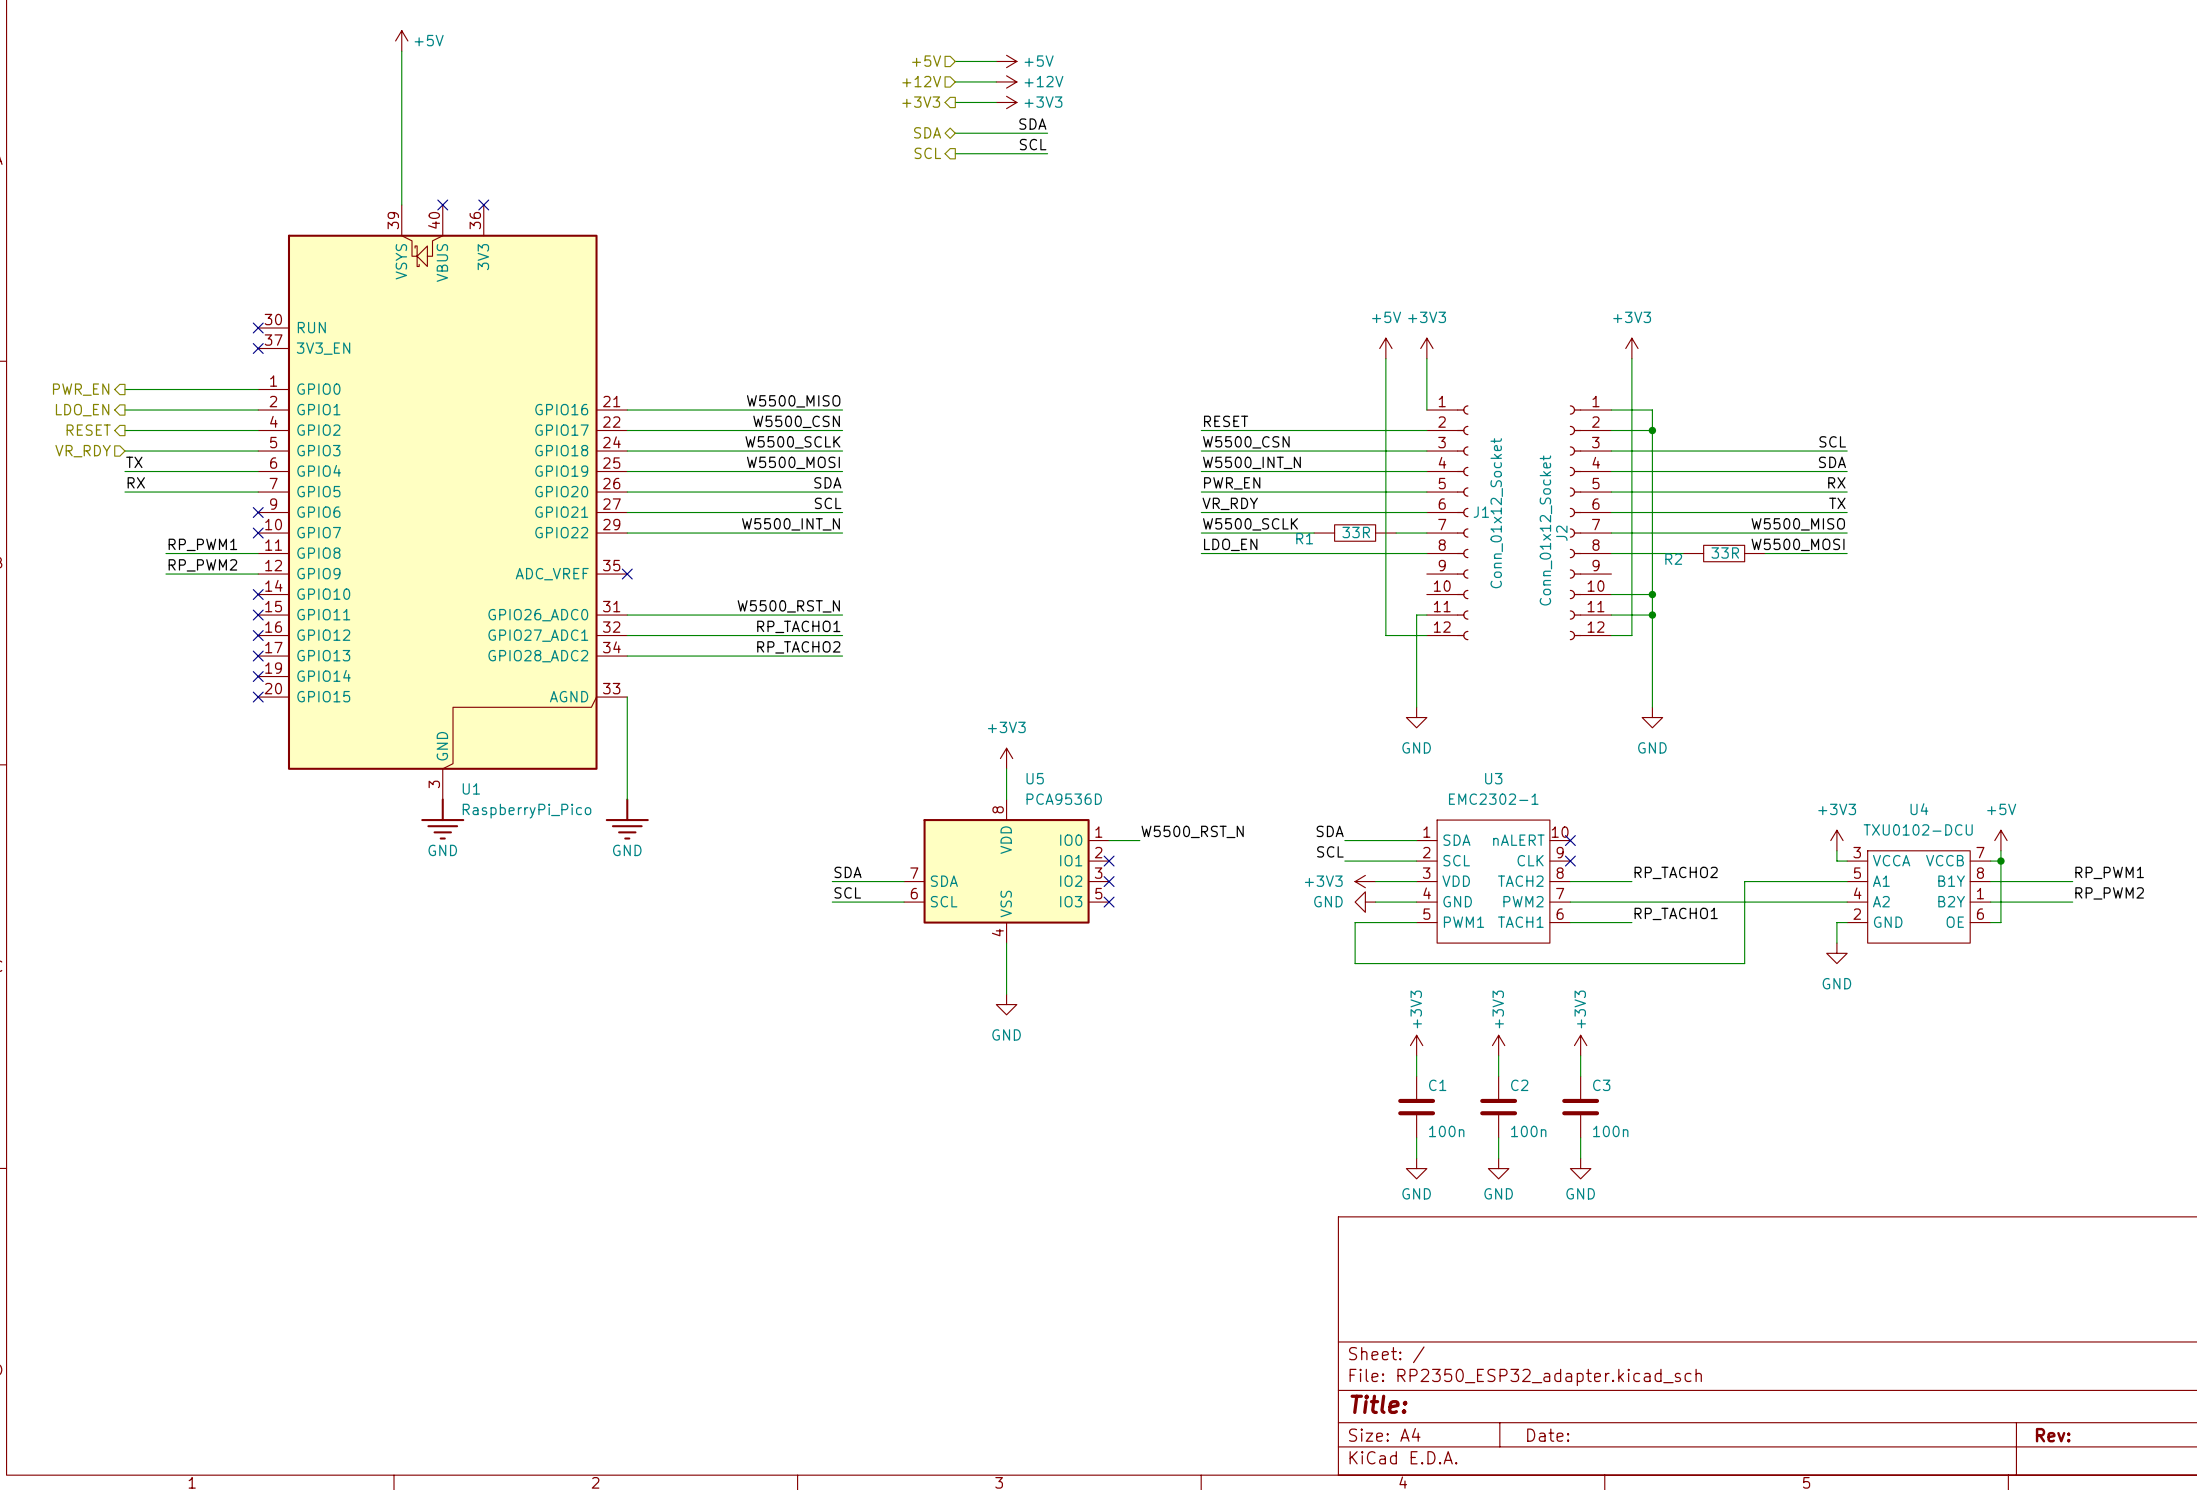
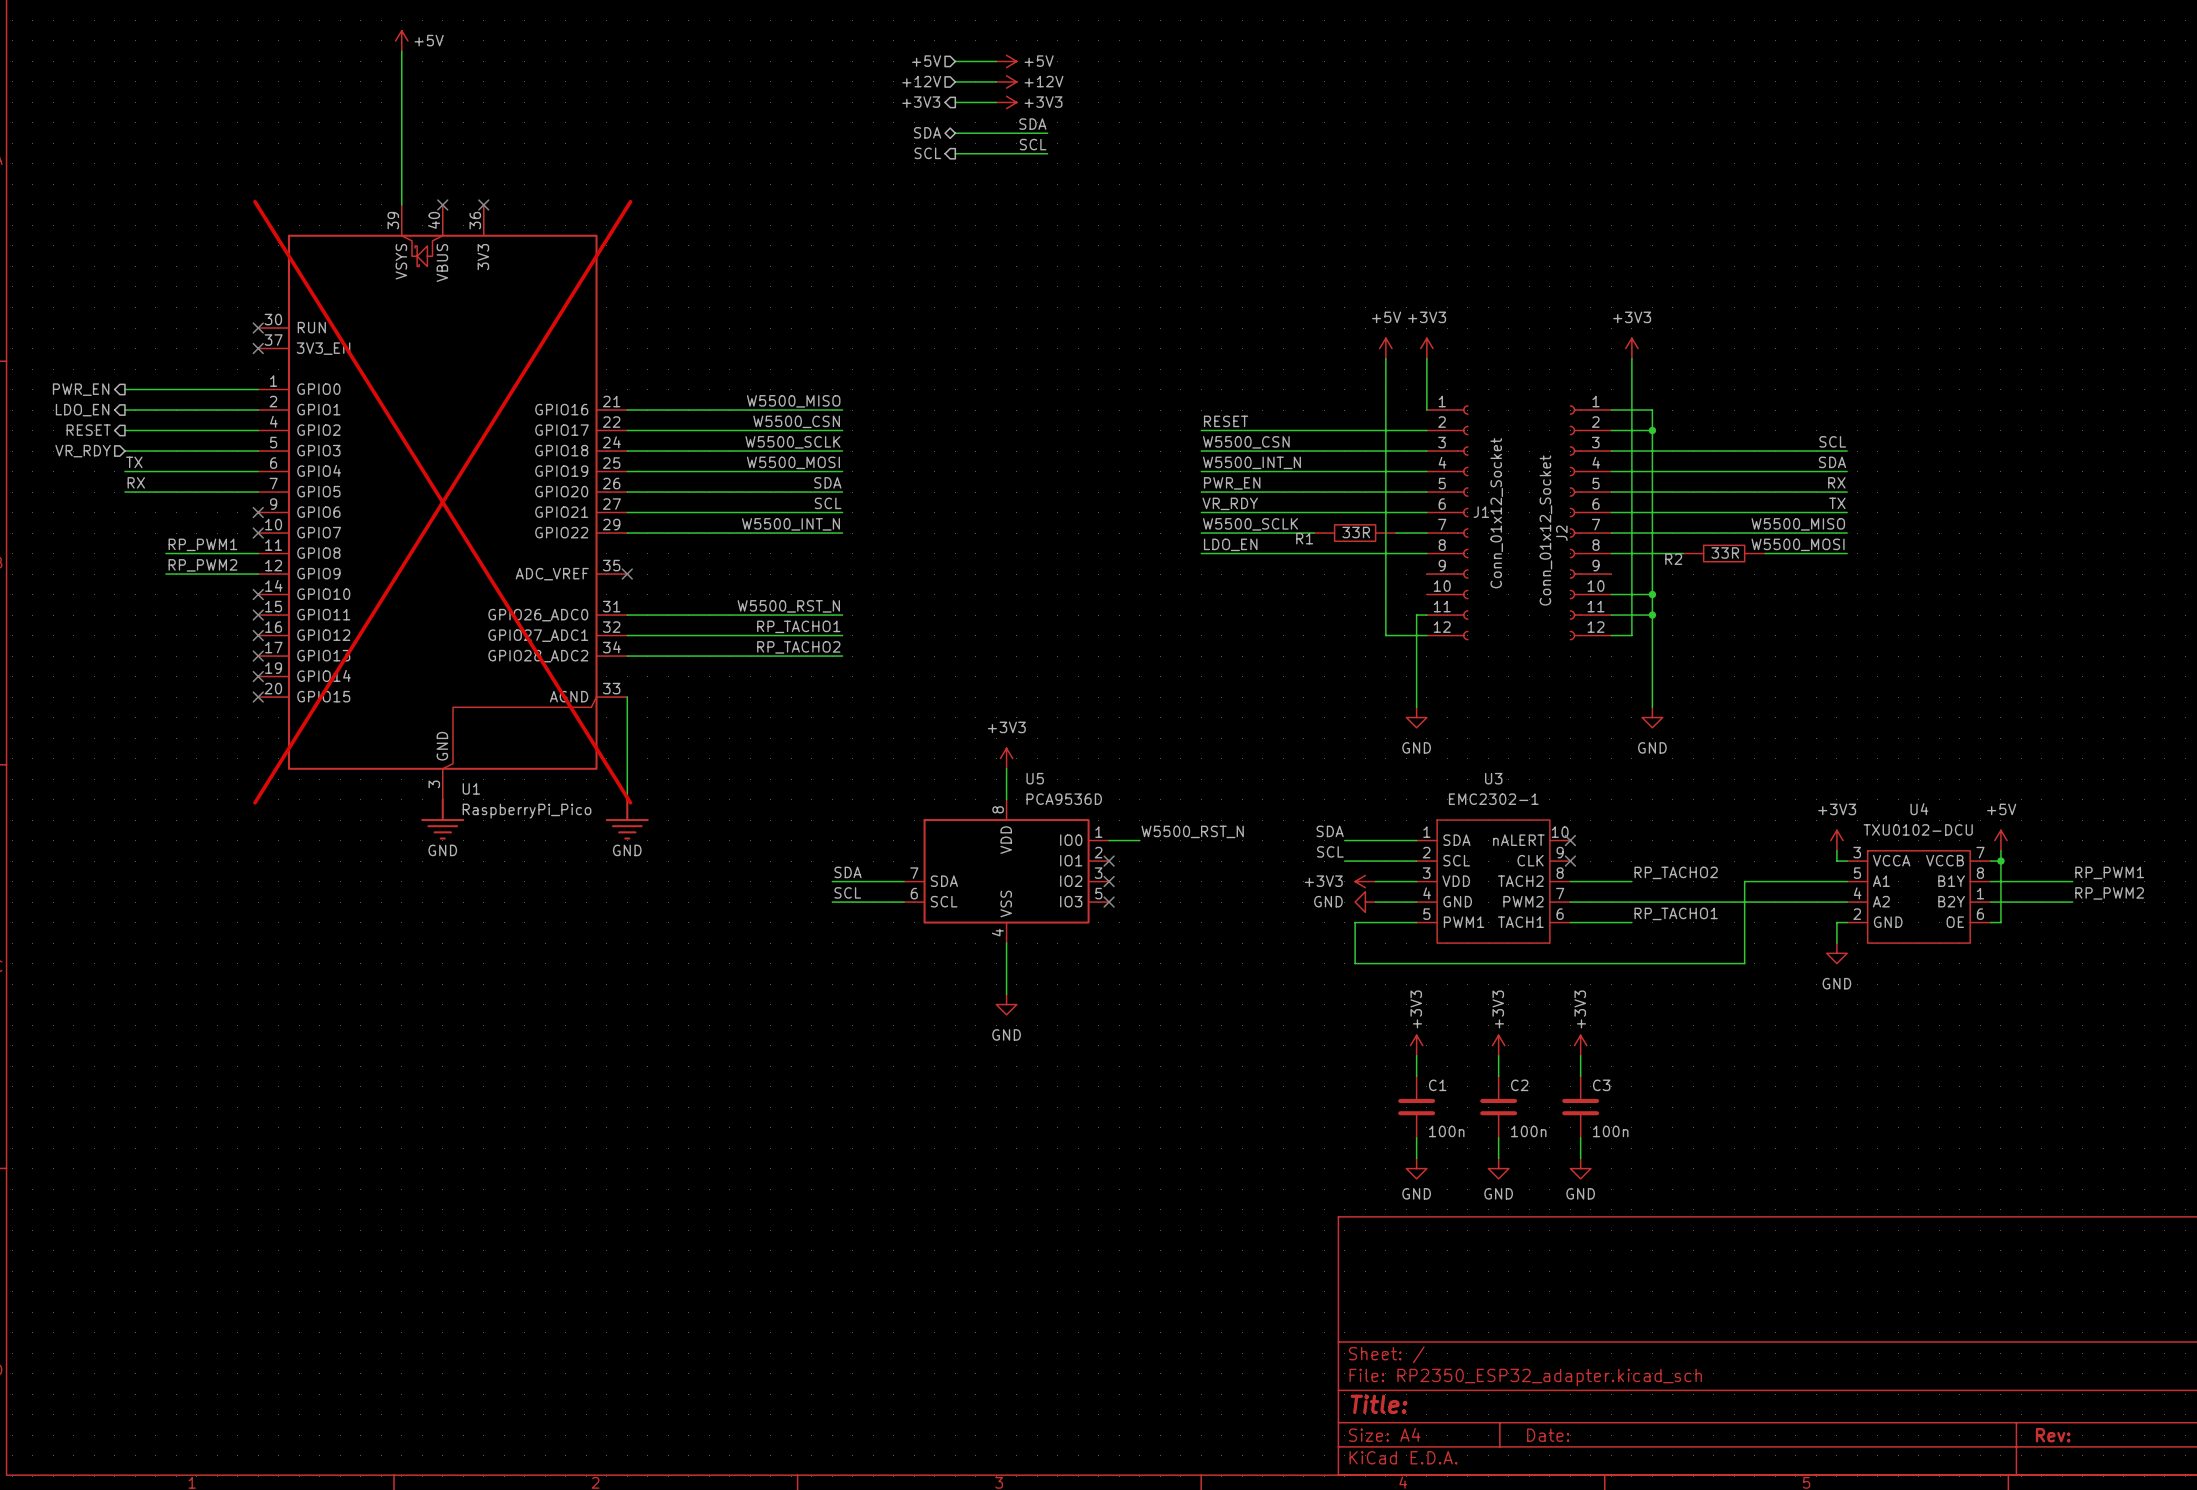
U1 do-not-place cross: none -> (442, 502)

